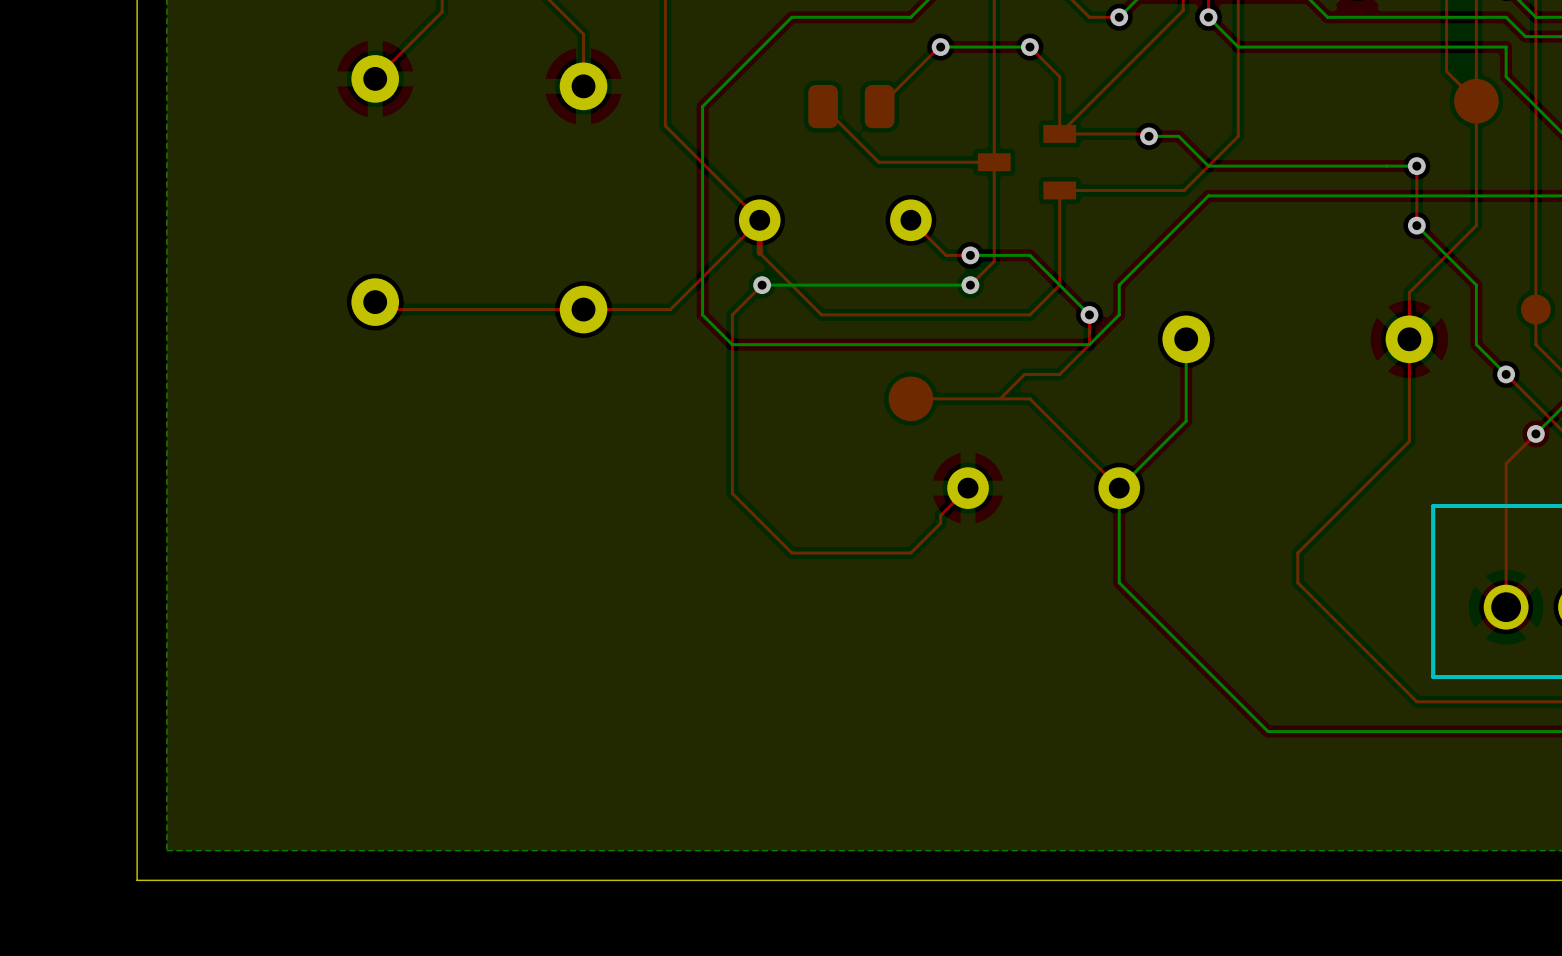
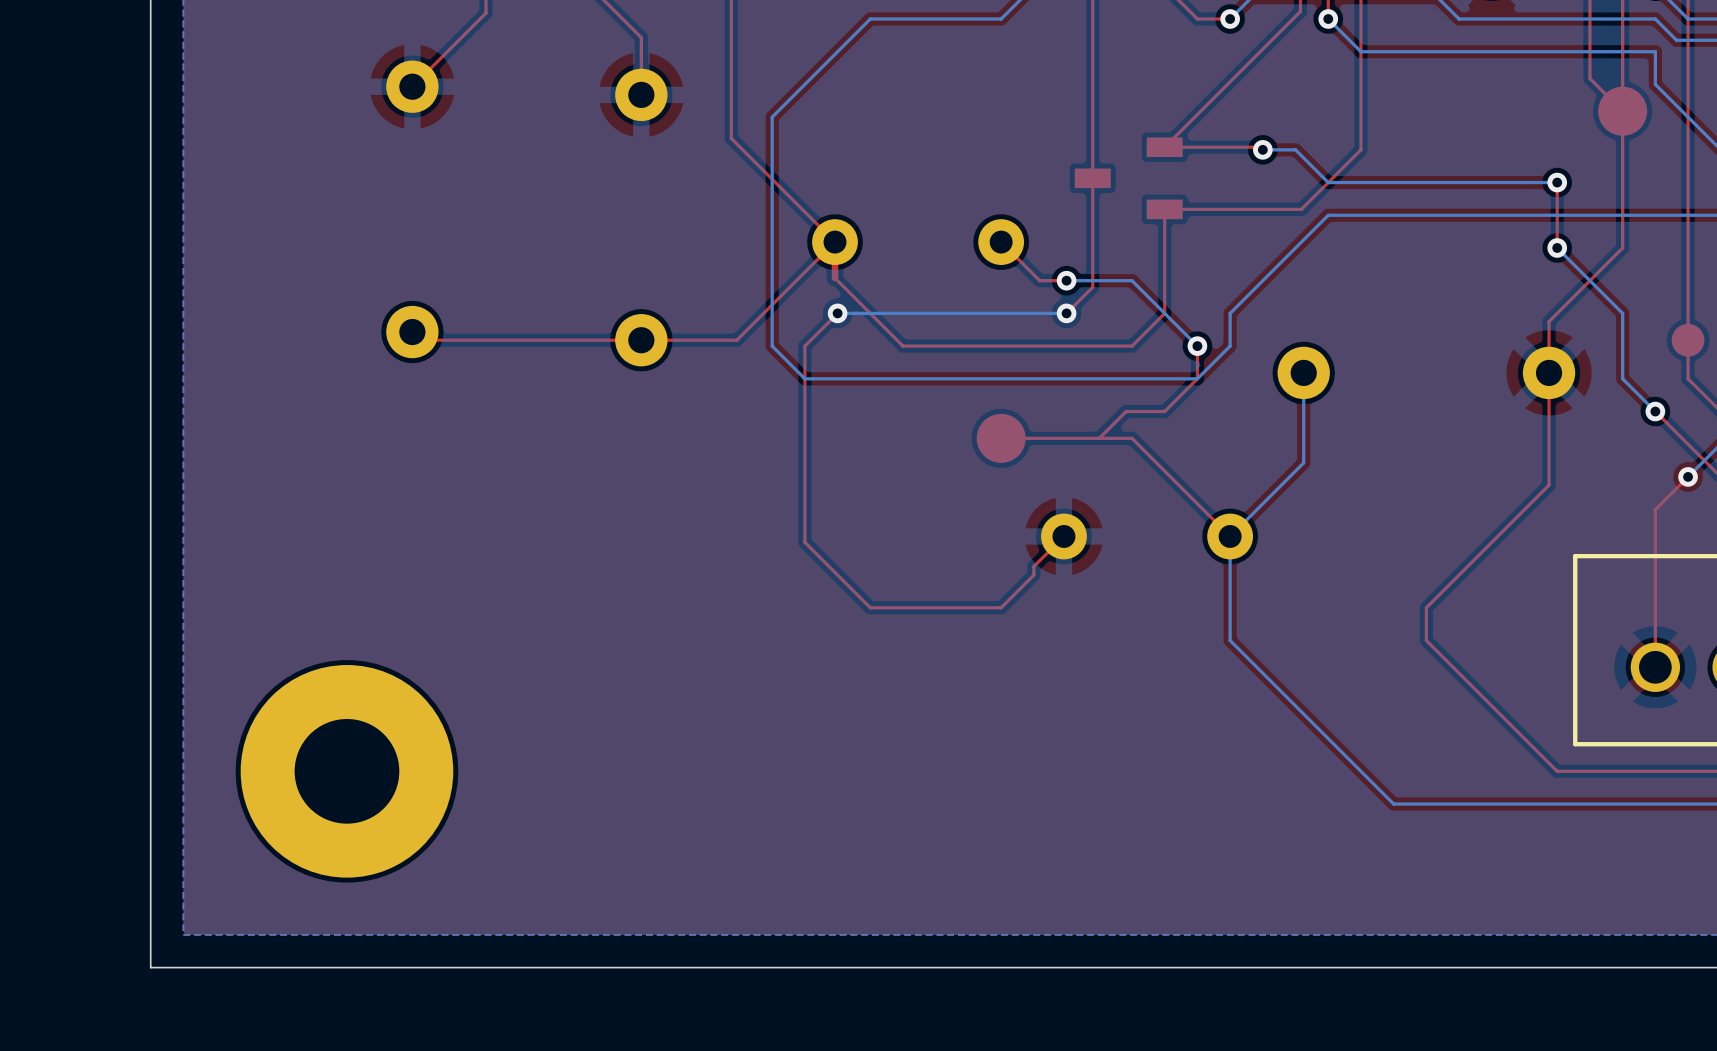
top track: (940, 47) (879, 106) -> none
via: (940, 47) -> none
top track: (1029, 47) (1059, 76) (1059, 133) -> none
bottom track: (1029, 47) (940, 47) -> none
via: (1029, 47) -> none
top track: (823, 106) (878, 162) (994, 162) -> none
part: (851, 106) -> none
part: none -> (346, 771)

